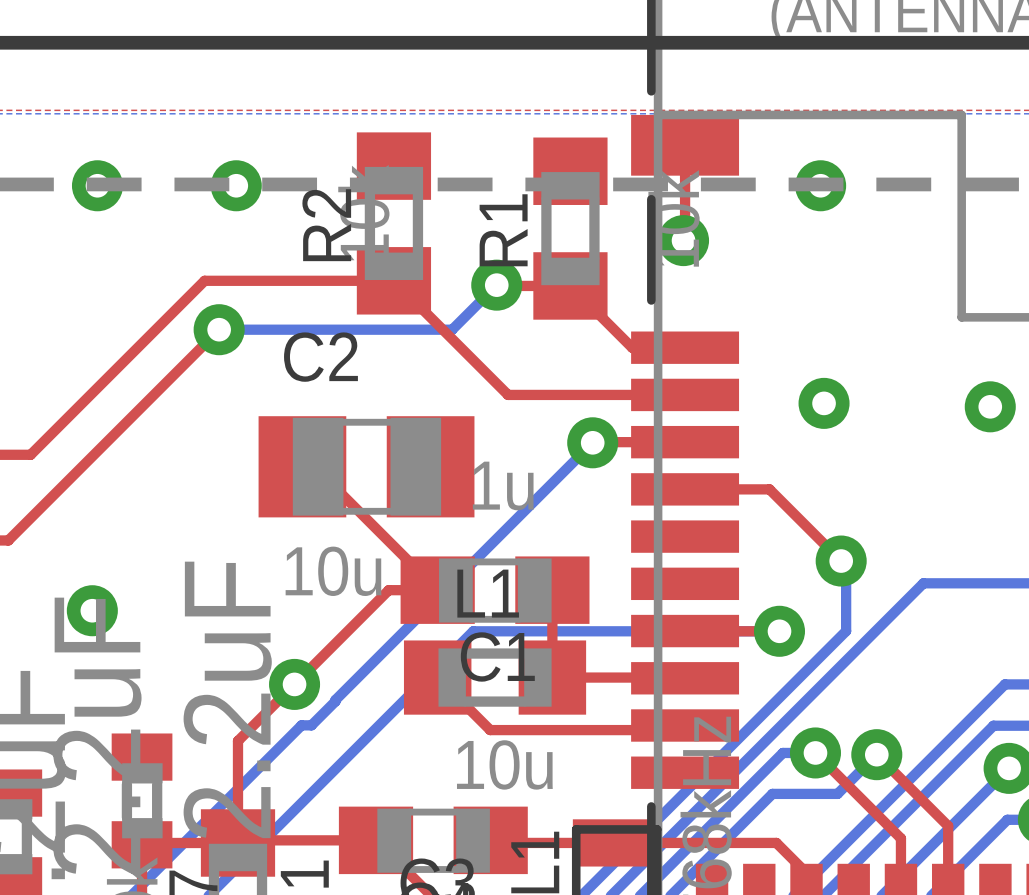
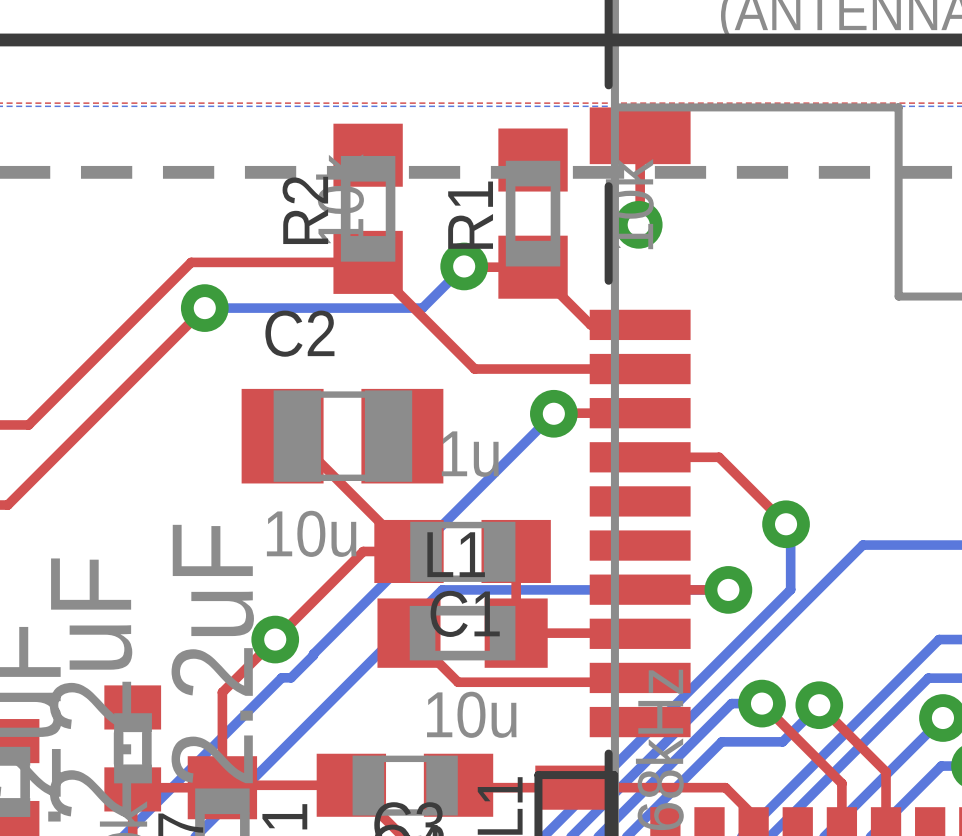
via: (97, 185) -> none
via: (236, 185) -> none
via: (820, 185) -> none
via: (824, 403) -> none
via: (990, 406) -> none
via: (92, 610) -> none

